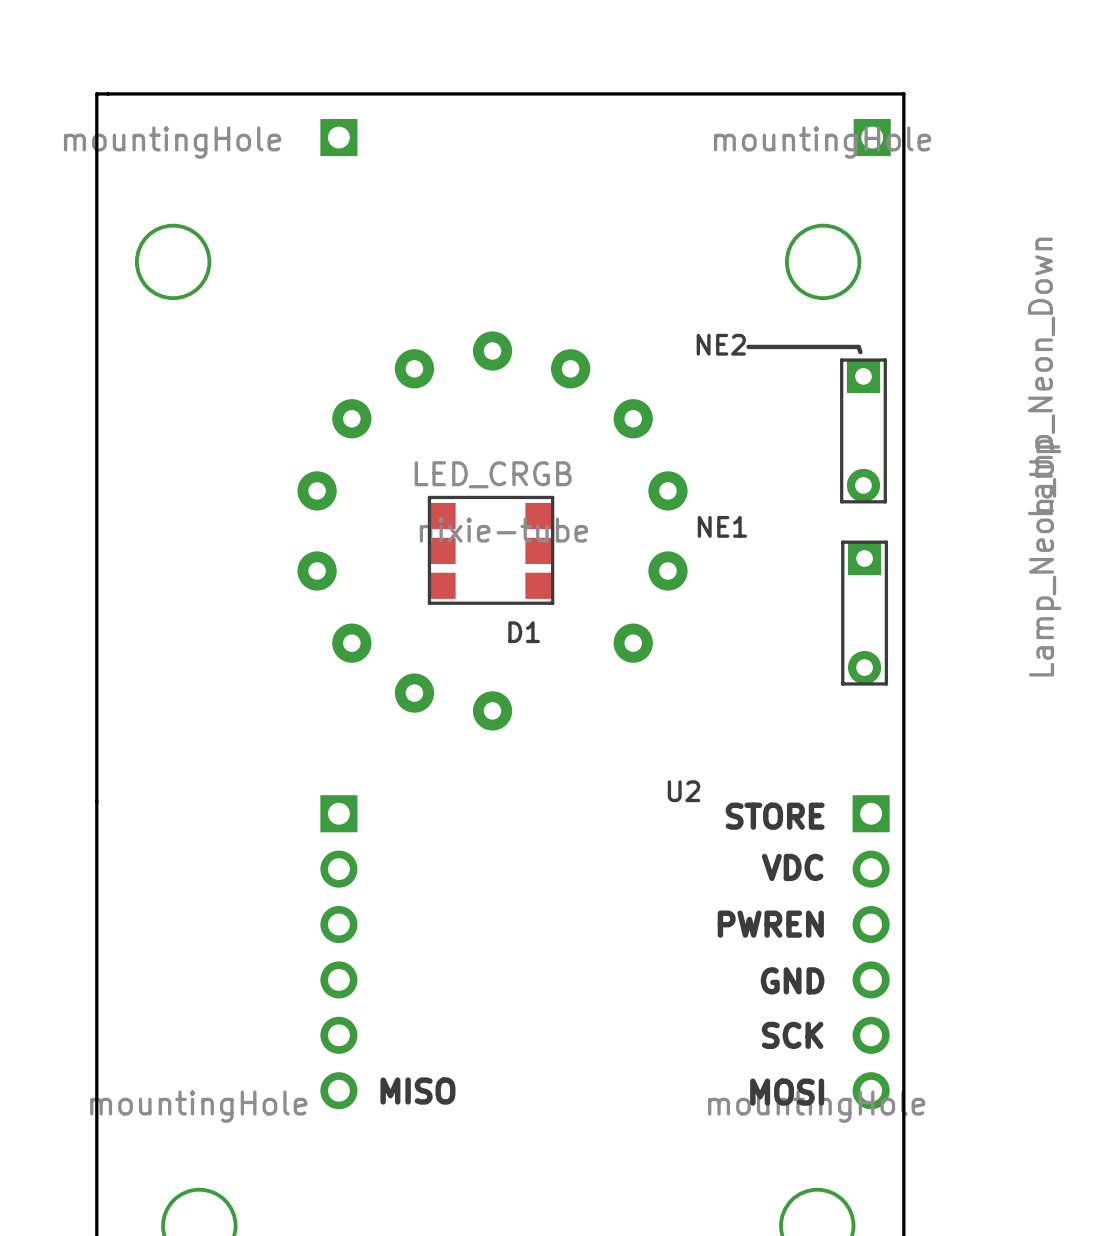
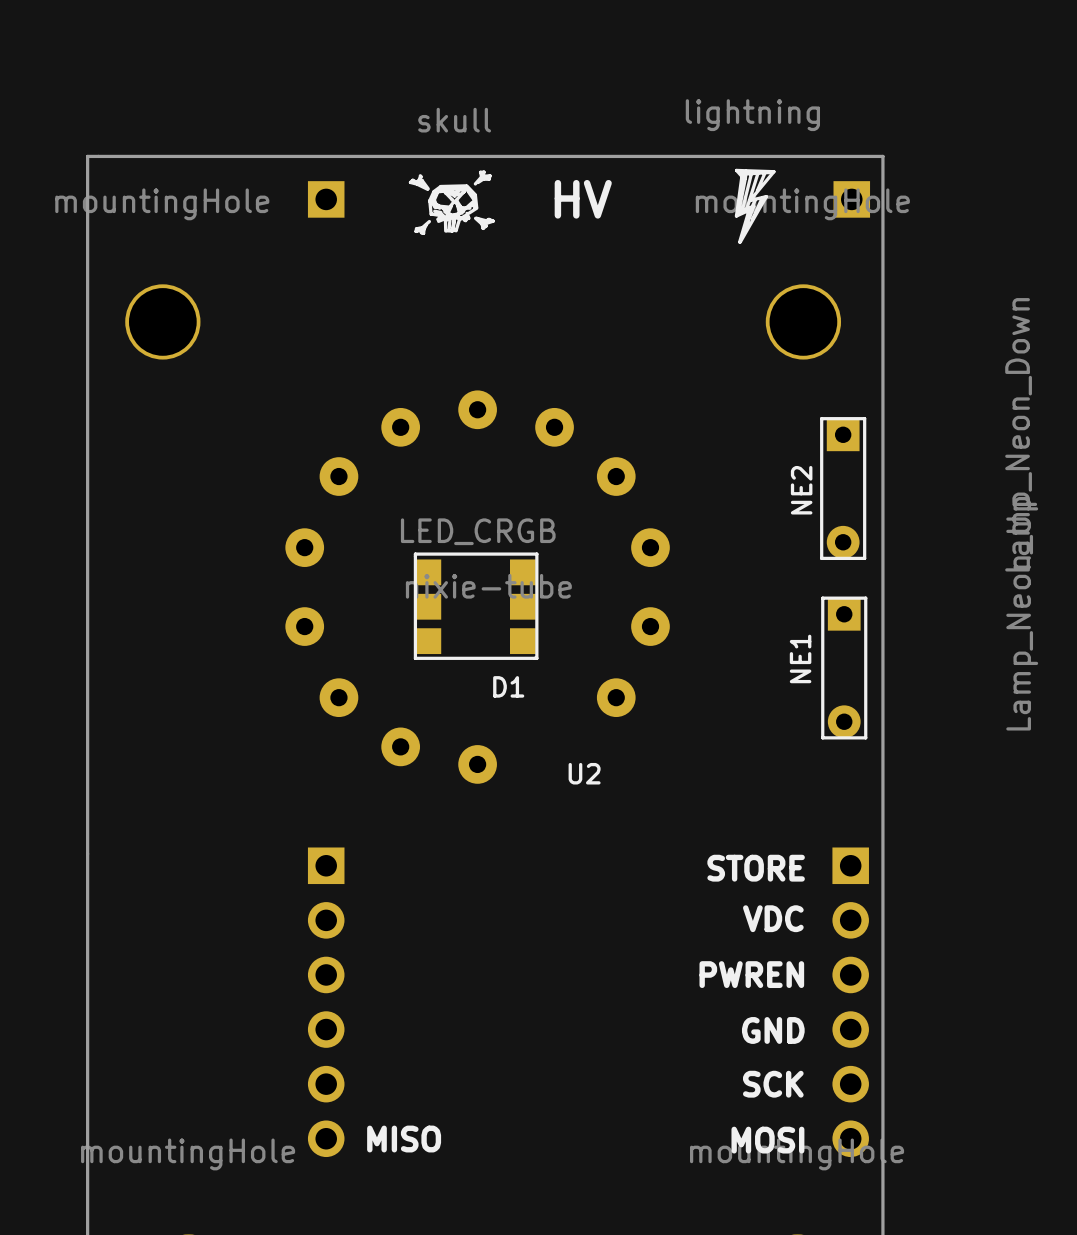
drawing: none -> [734, 168, 776, 244]
drawing: none -> [408, 170, 495, 236]
text: none -> HV (583, 199)
NE2 name rotation: 0° (721, 344) -> 90° counterclockwise (801, 490)
NE2 name position: NE2 (721, 344) -> NE2 (801, 490)
line: (748, 346) (858, 346) (860, 352) -> none
NE1 name rotation: 0° (722, 526) -> 90° counterclockwise (800, 658)
NE1 name position: NE1 (722, 526) -> NE1 (800, 658)
U2 name position: U2 (683, 791) -> U2 (584, 773)

